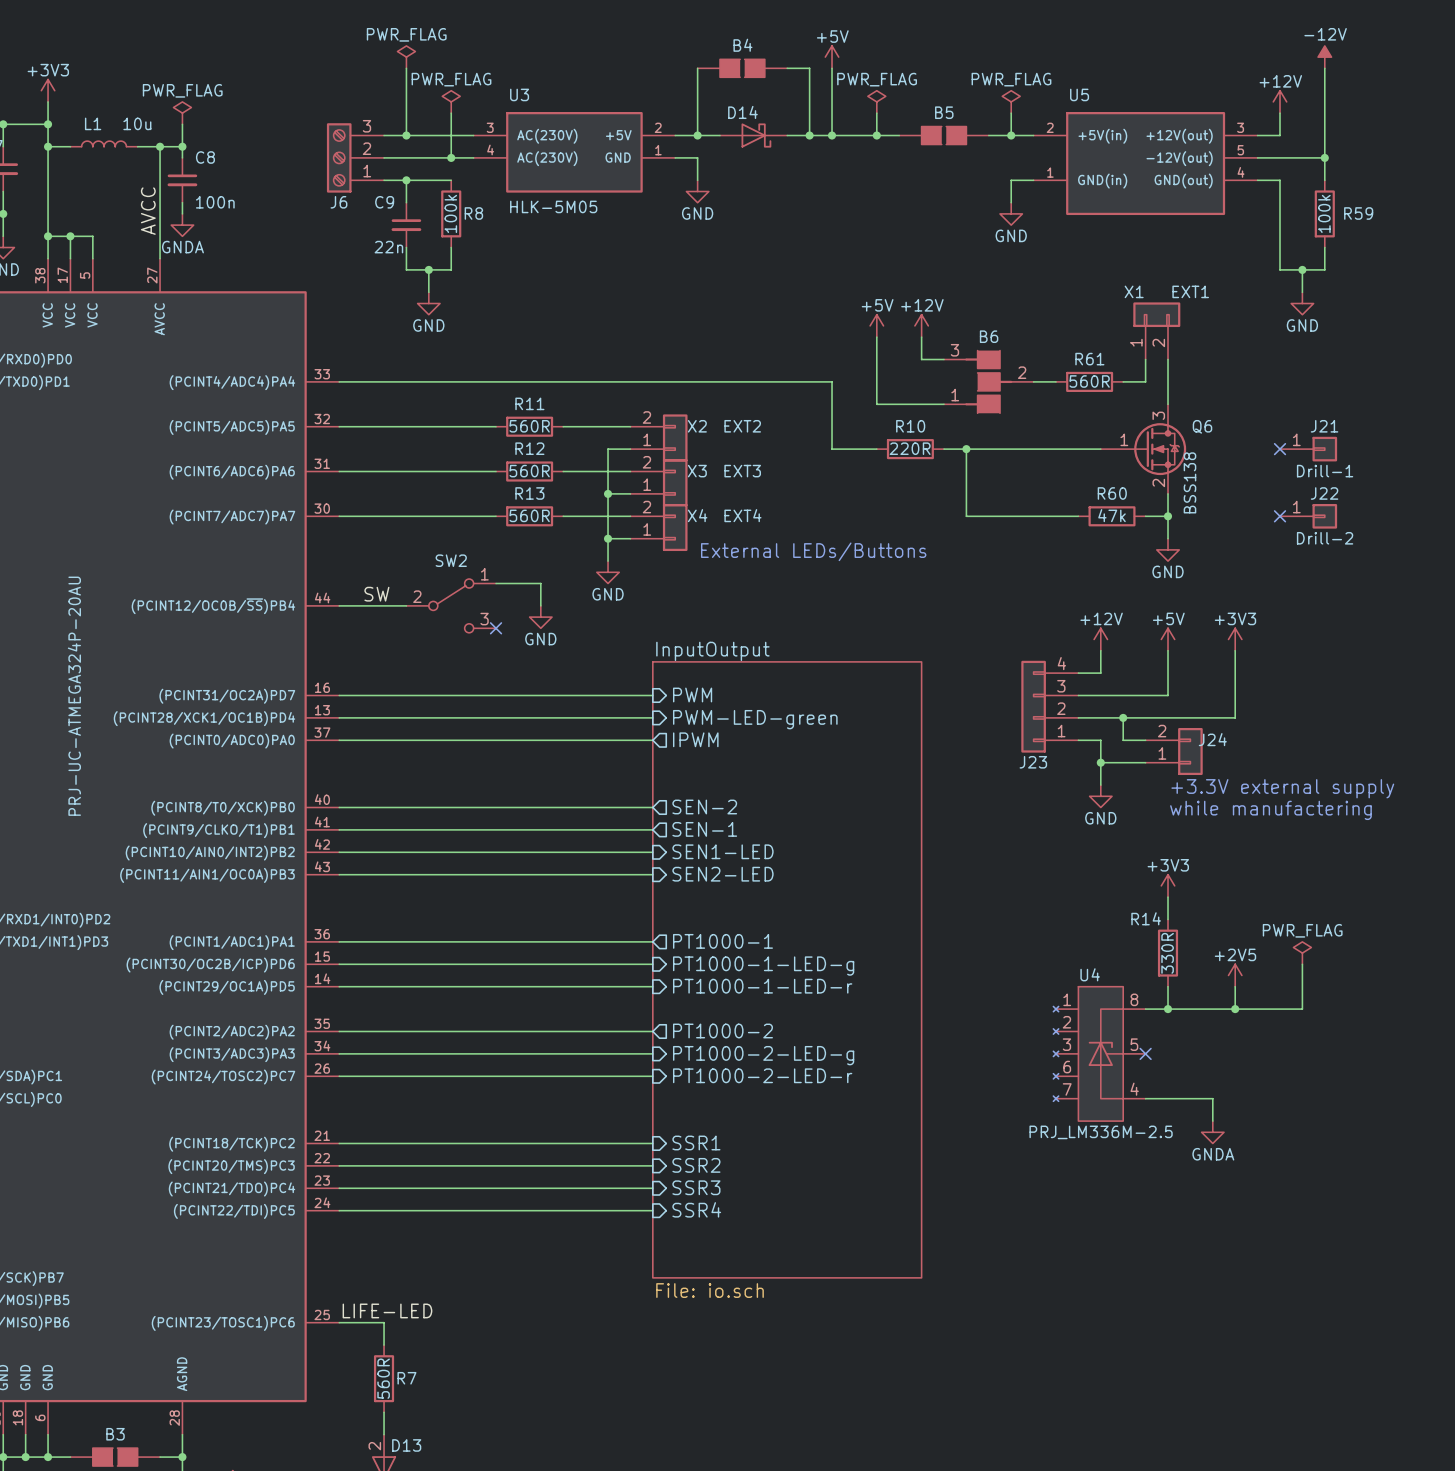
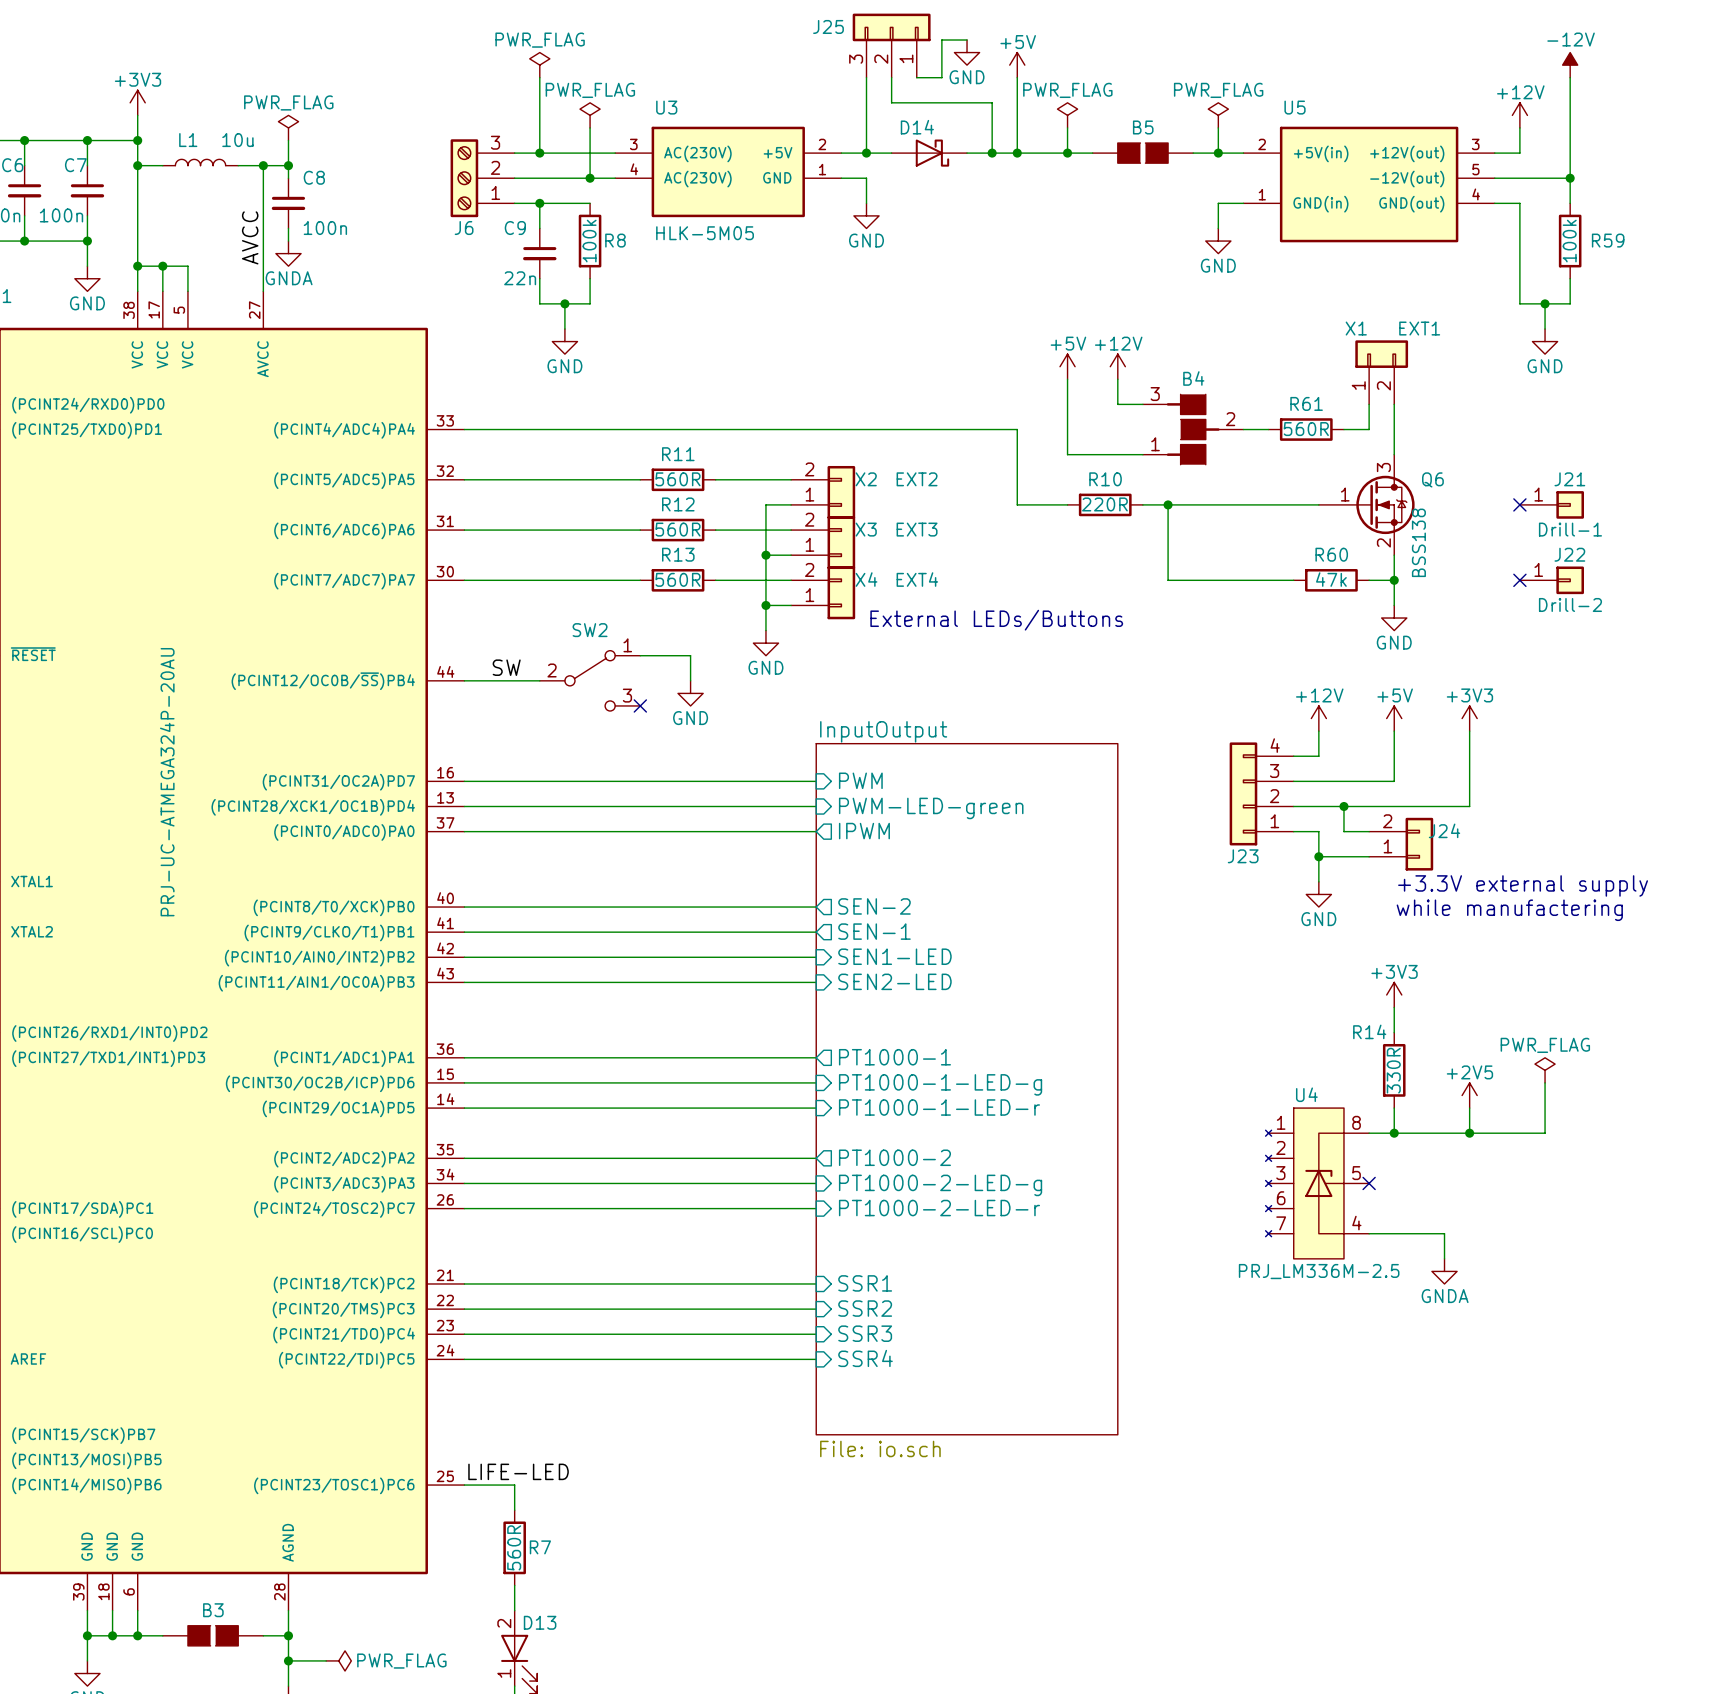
wire: none -> (967, 40) (941, 40) (941, 77) (916, 77)
J25: none -> (891, 45)
power symbol: none -> GND (967, 52)
B4: (742, 68) -> none
wire: (787, 68) (809, 68) (809, 90) -> (891, 77) (891, 102) (992, 102)
B6 name: B6 (989, 336) -> B4 (1193, 378)

